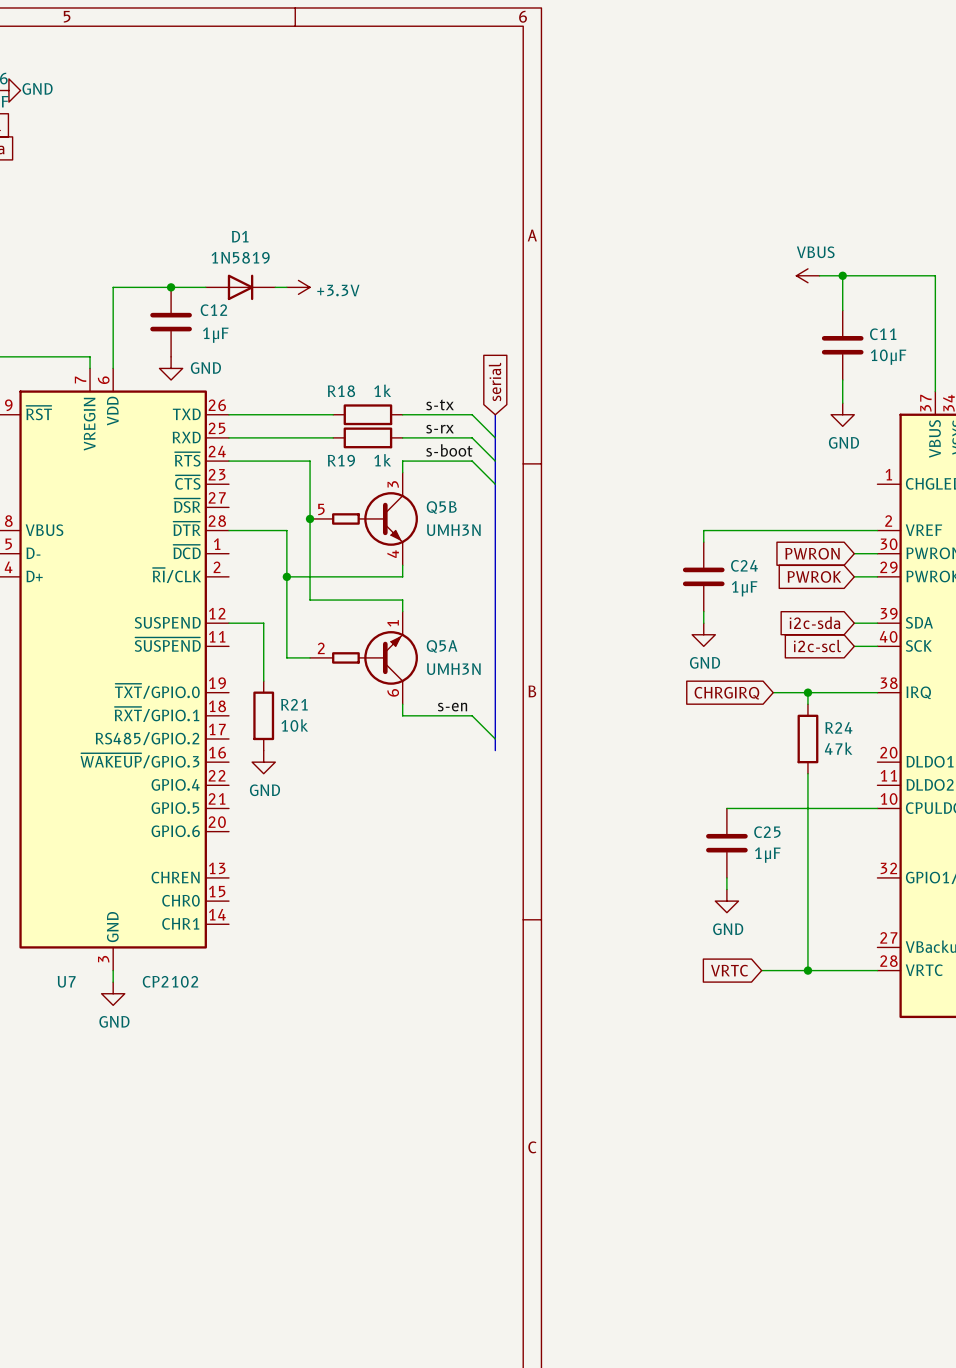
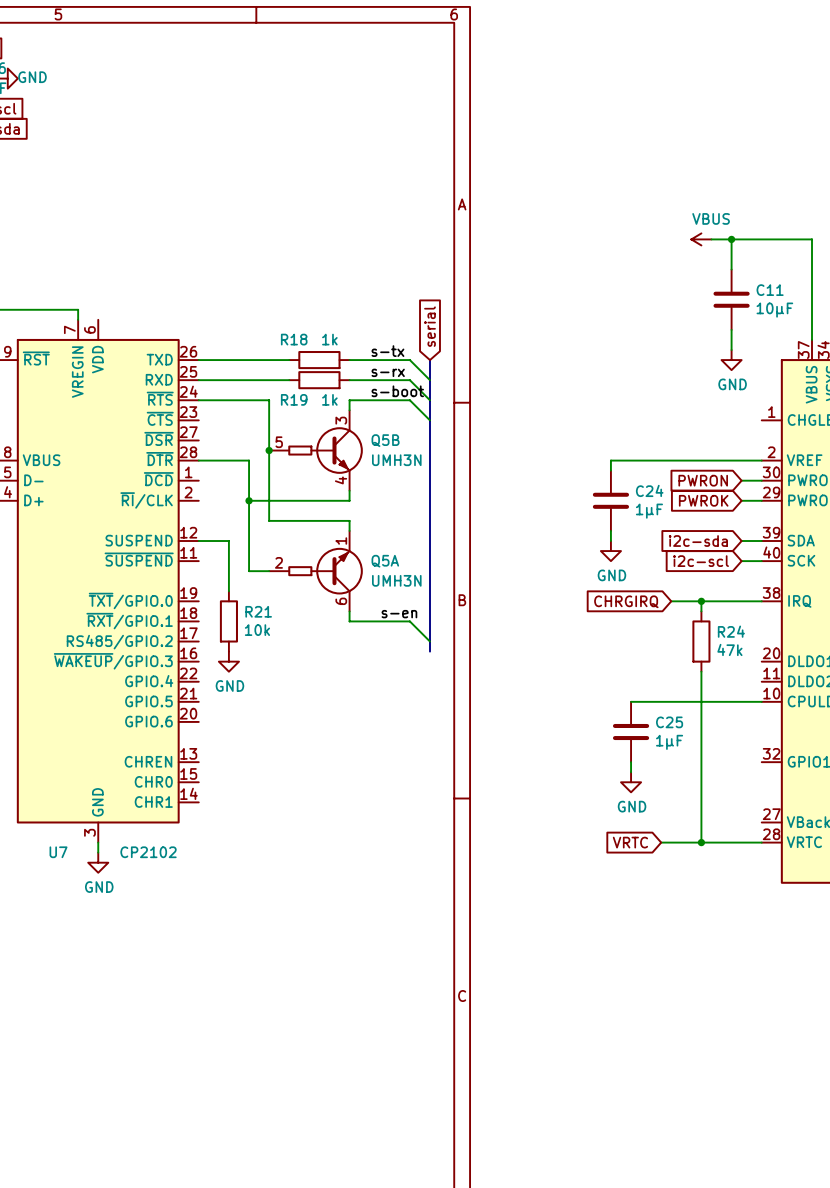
junction: (171, 287) -> none
wire: (205, 287) (113, 287) (113, 368) -> none
D1: 1N5819 (240, 287) -> none
wire: (275, 287) (286, 287) -> none
power symbol: +3.3V (298, 287) -> none
C12: 1μF (171, 322) -> none
power symbol: GND (171, 368) -> none

